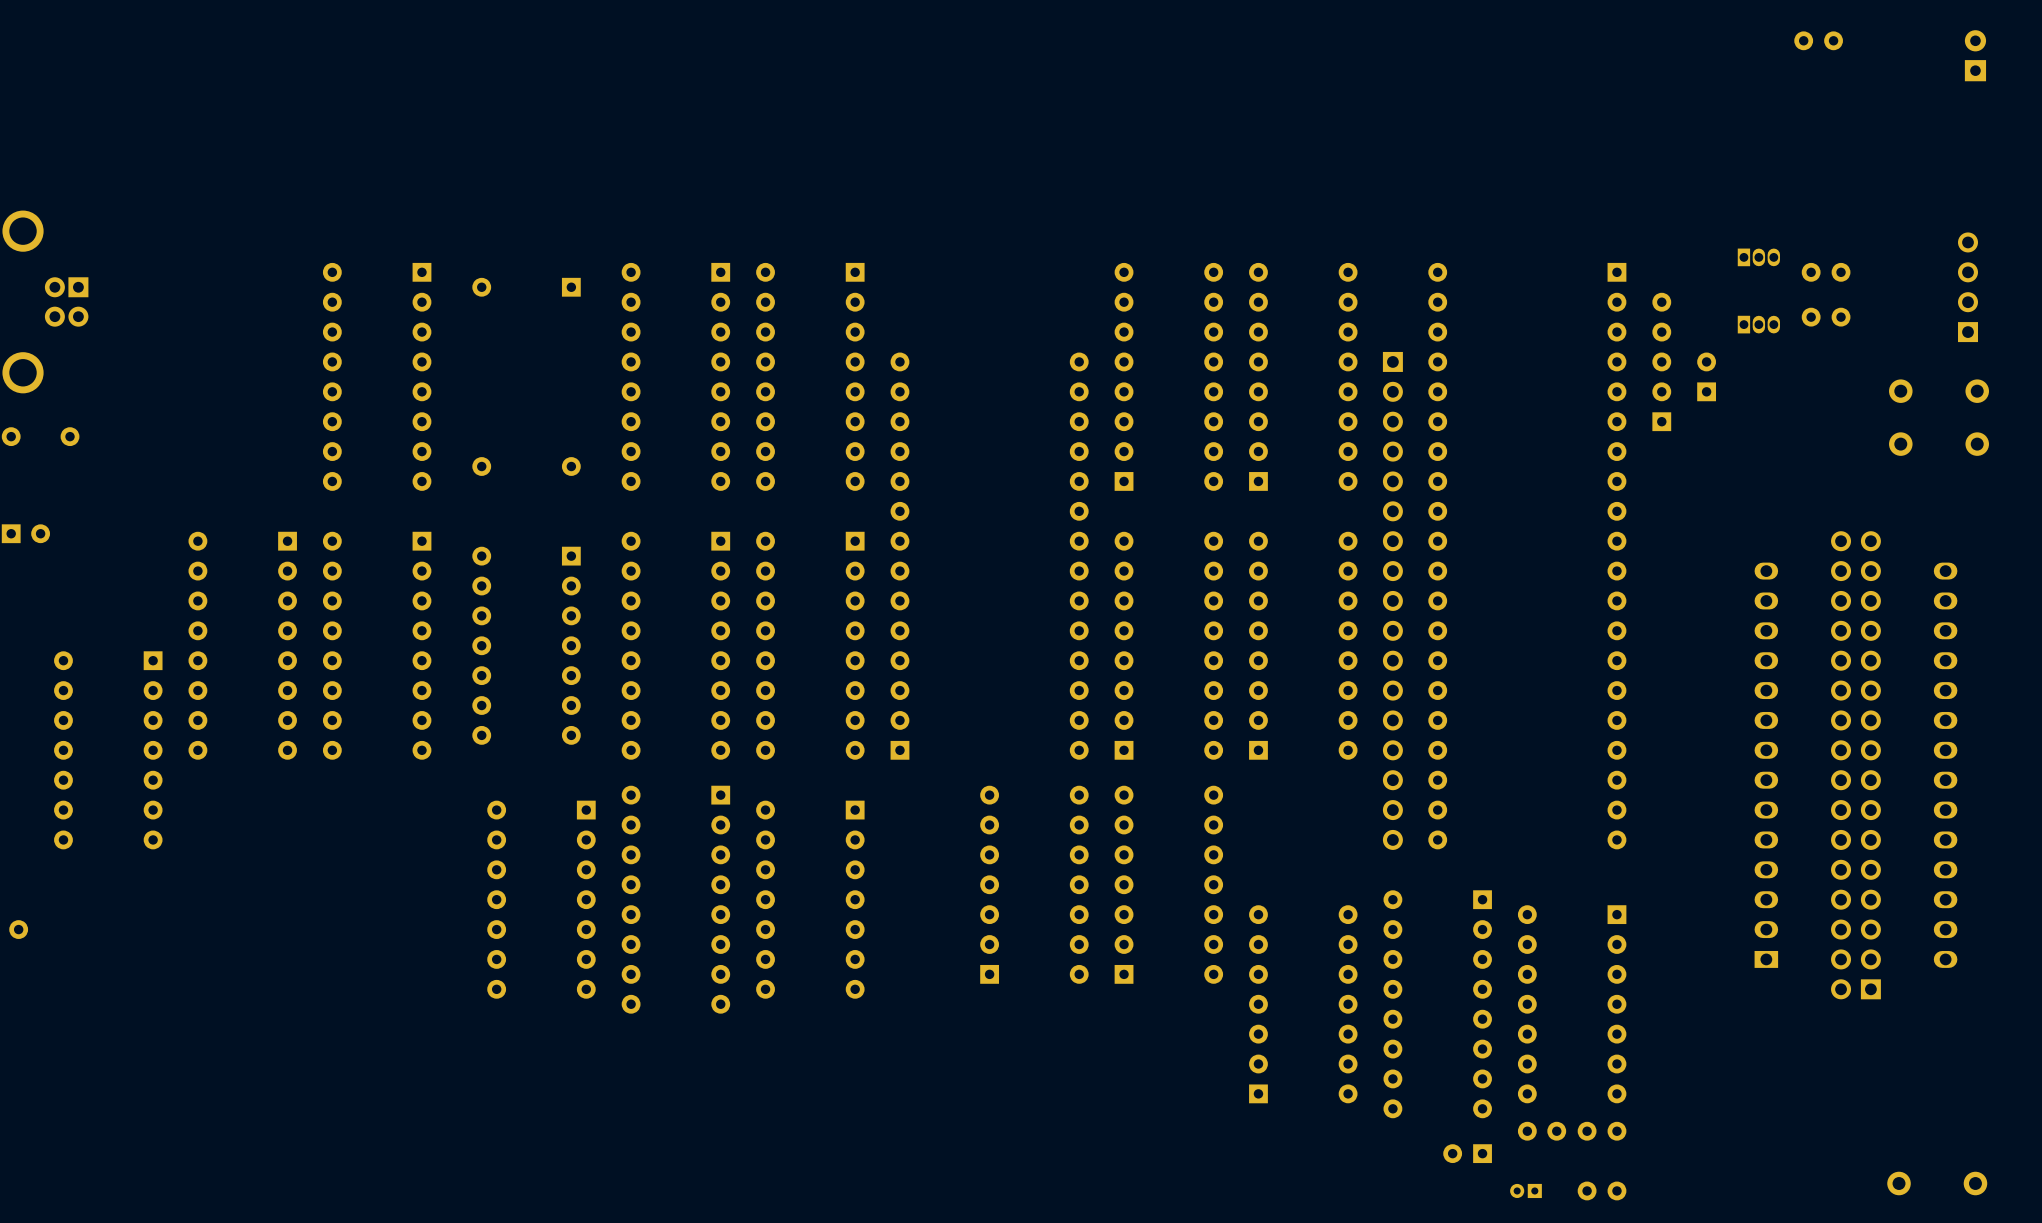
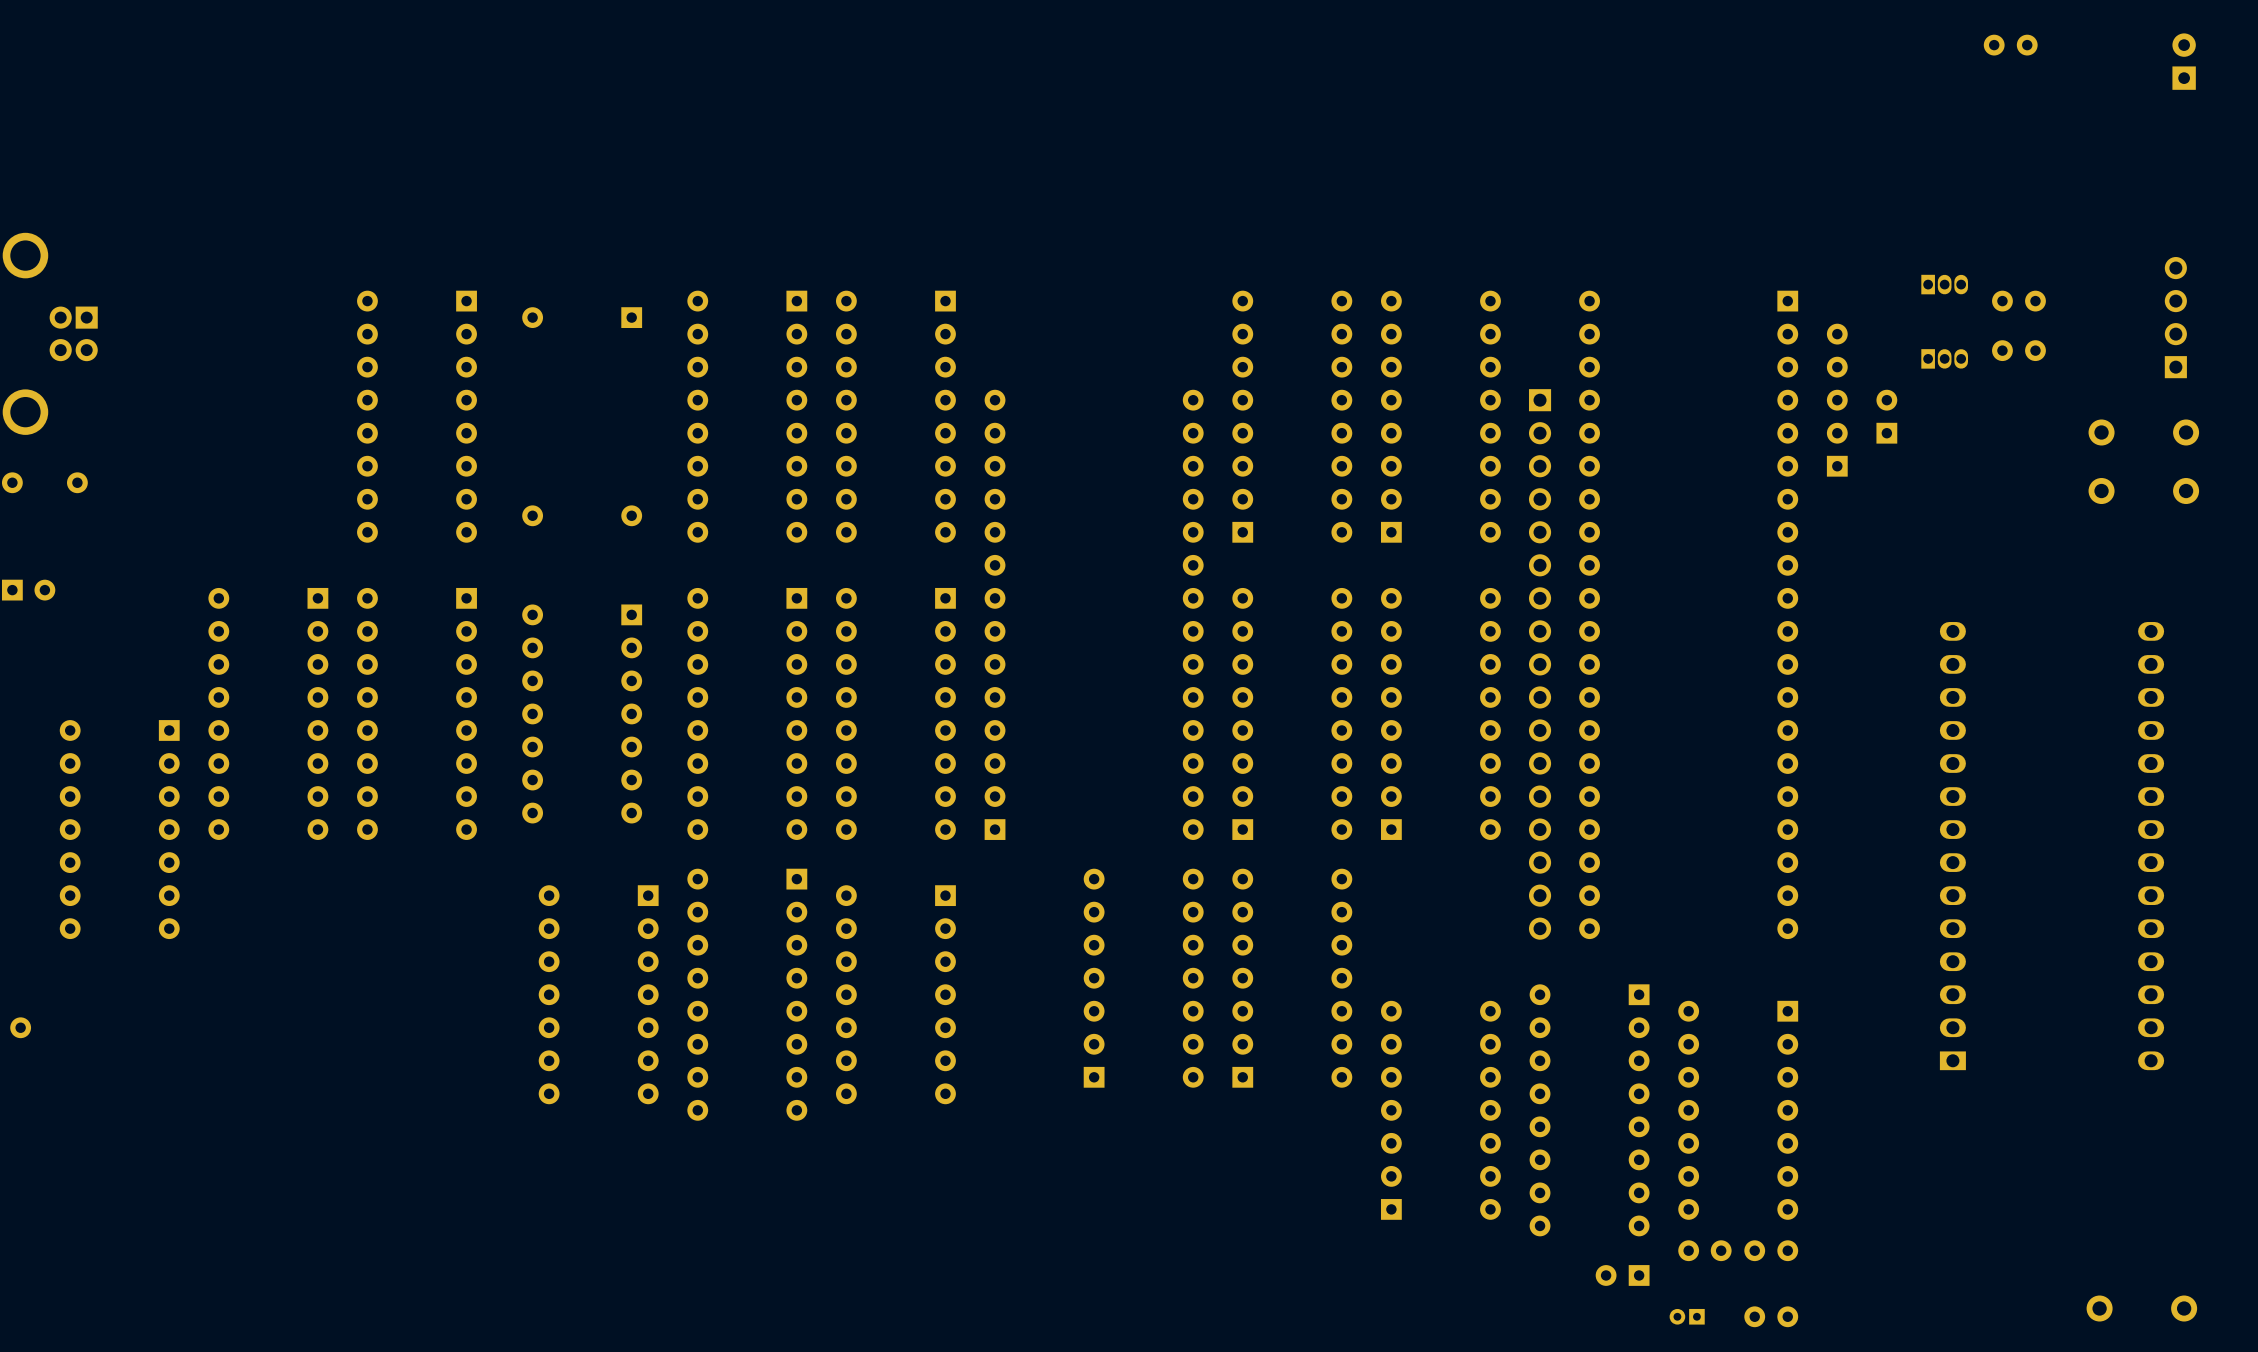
part: (1855, 765) -> none

